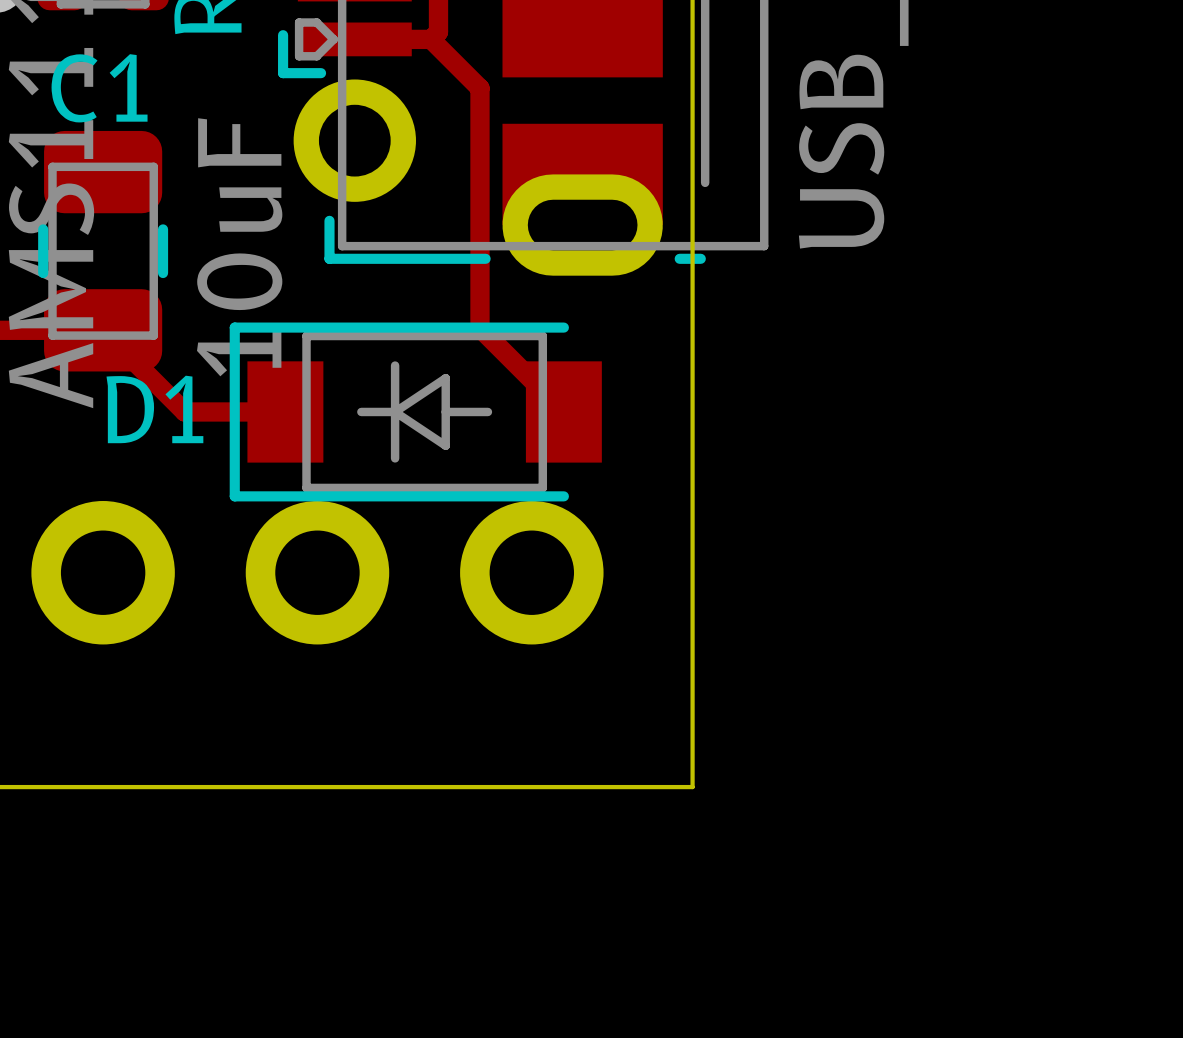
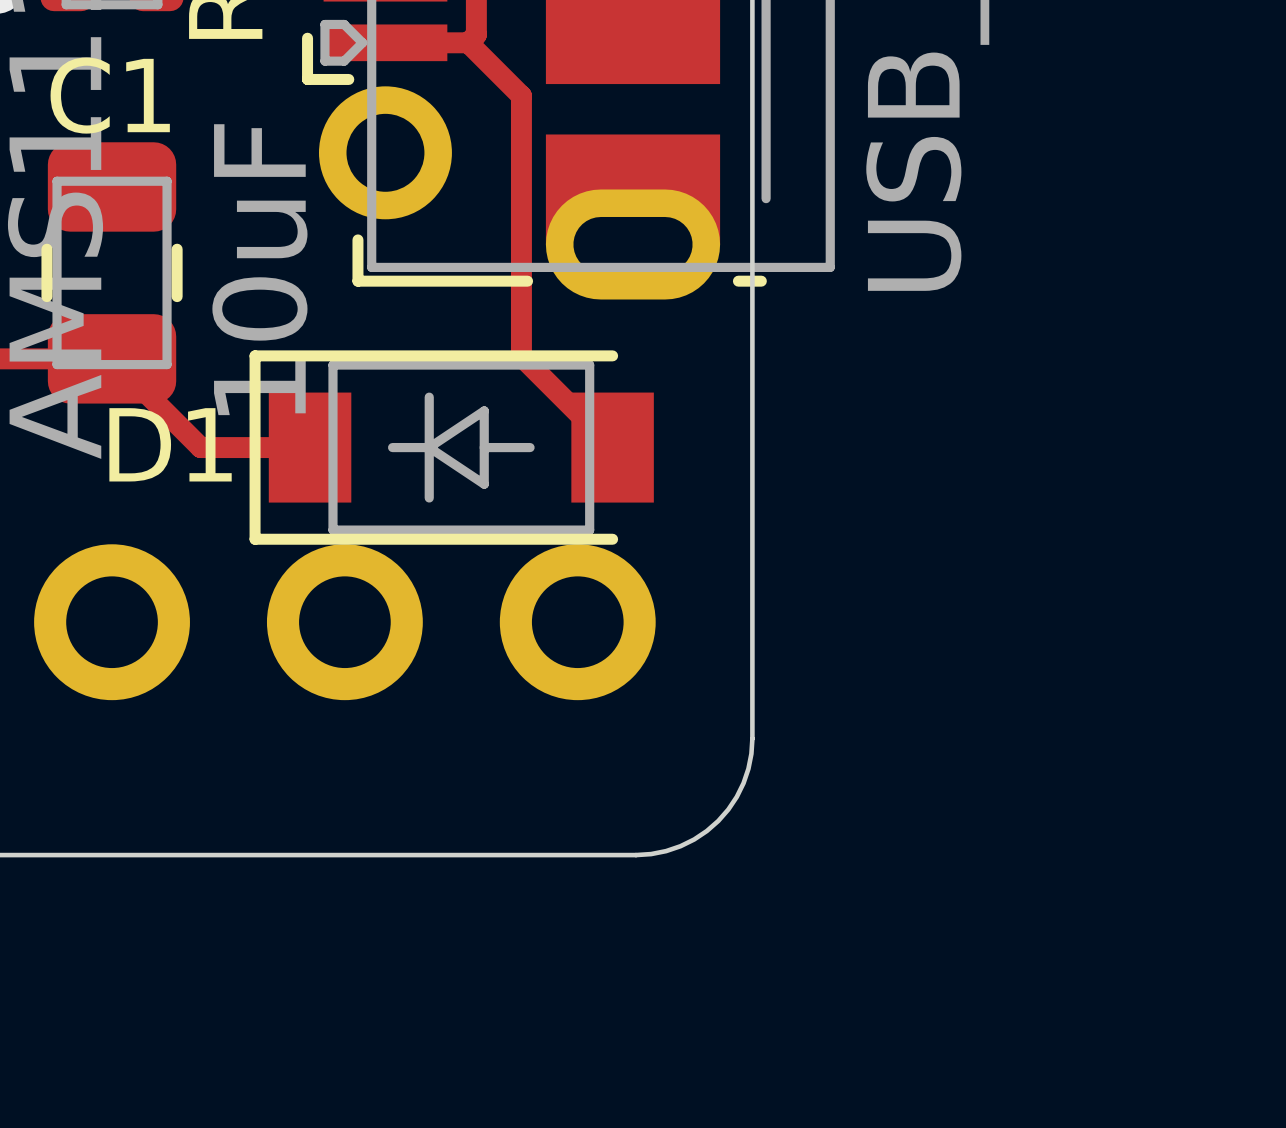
board edge: (692, 679) (692, 787) (585, 787) -> (752, 738) (748, 768) (743, 783) (736, 796) (718, 820) (706, 831) (680, 846) (651, 854) (635, 855)

